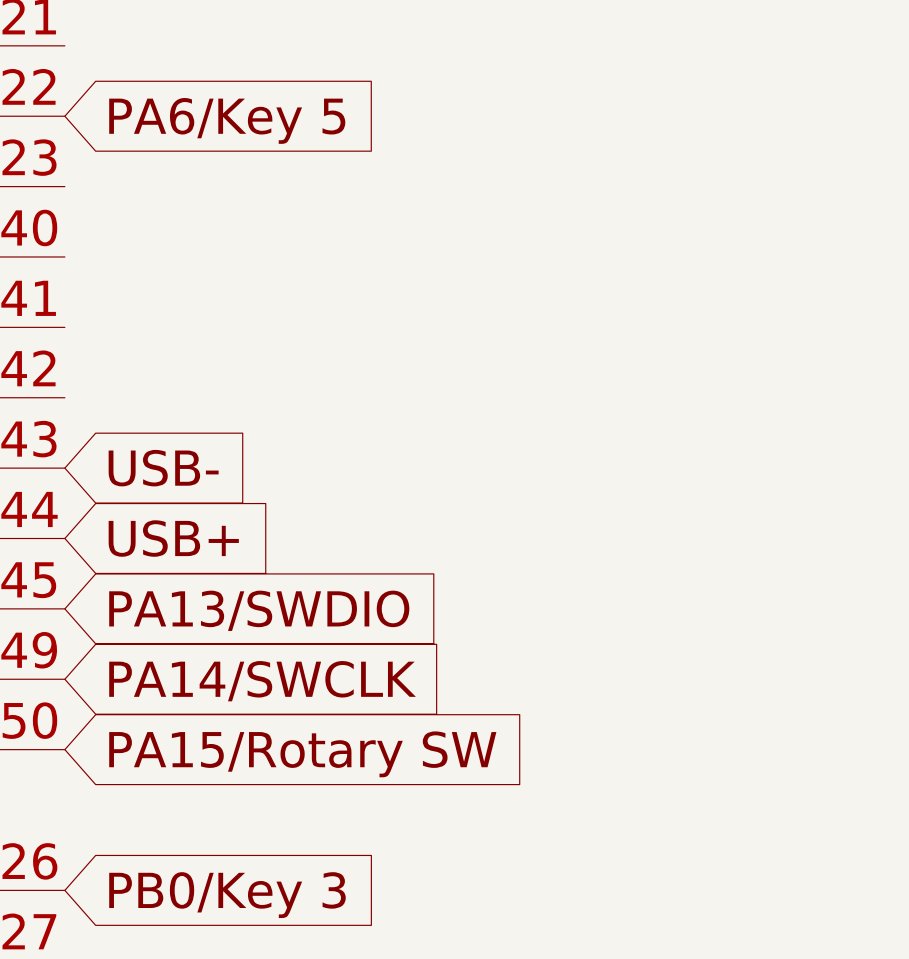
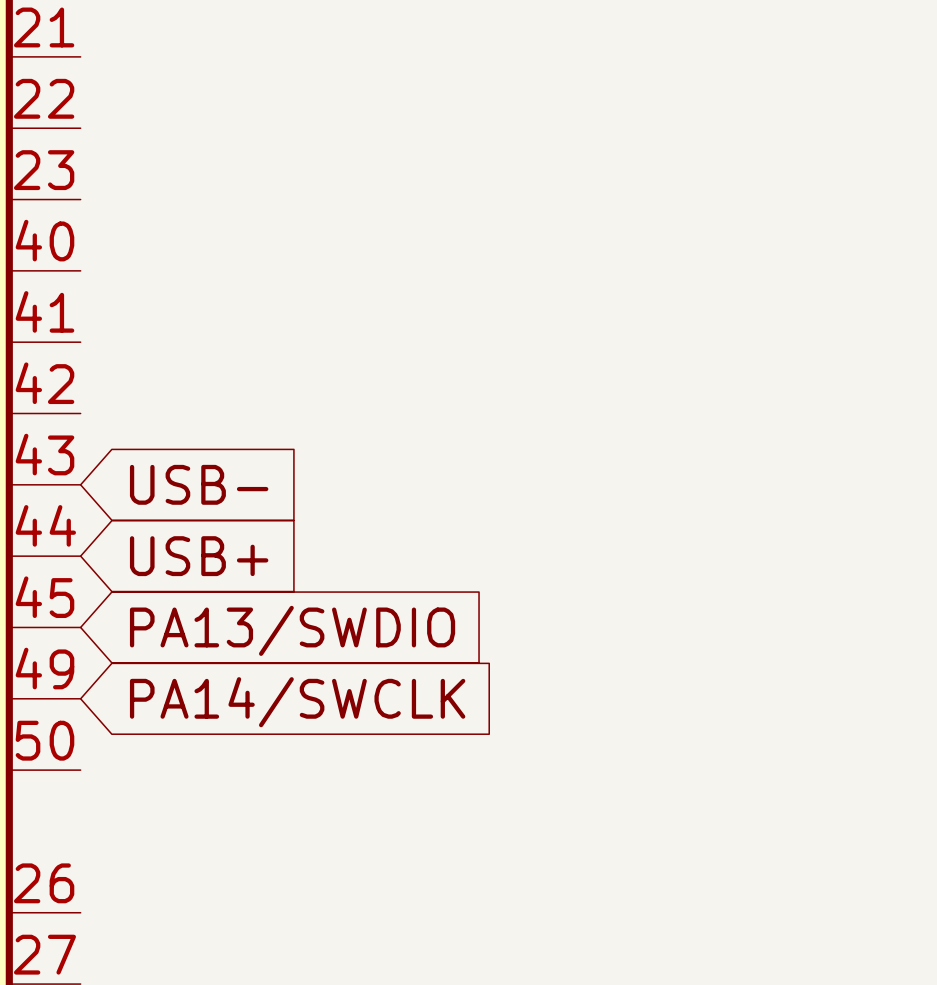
global label: PA6/Key 5 (227, 120) -> none
global label: PA15/Rotary SW (302, 754) -> none
global label: PB0/Key 3 (227, 895) -> none

